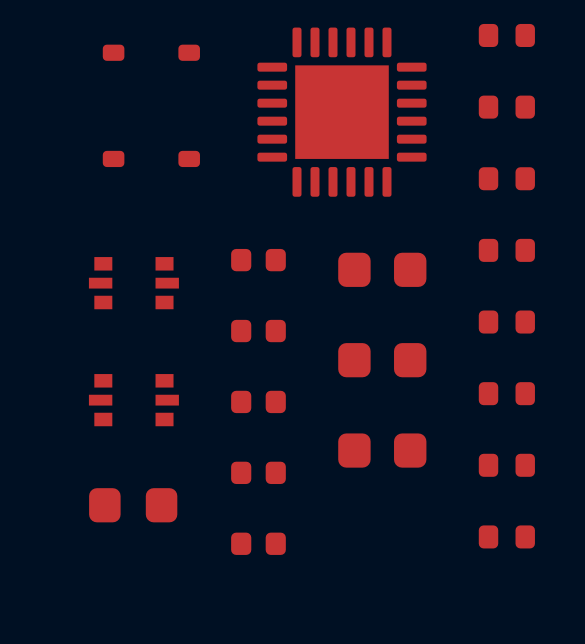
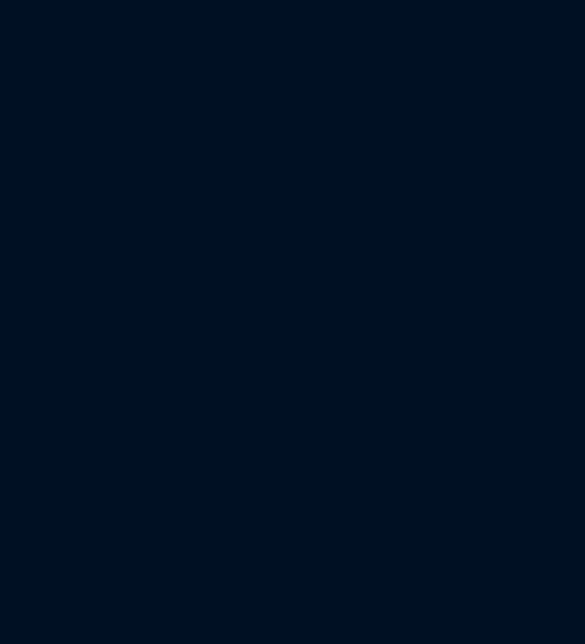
part: (506, 35) -> none
part: (151, 52) -> none
part: (506, 107) -> none
part: (341, 112) -> none
part: (151, 158) -> none
part: (506, 178) -> none
part: (506, 250) -> none
part: (258, 260) -> none
part: (382, 269) -> none
part: (133, 283) -> none
part: (506, 322) -> none
part: (258, 331) -> none
part: (382, 360) -> none
part: (506, 393) -> none
part: (133, 400) -> none
part: (258, 401) -> none
part: (382, 450) -> none
part: (506, 465) -> none
part: (258, 472) -> none
part: (133, 505) -> none
part: (506, 536) -> none
part: (258, 543) -> none

